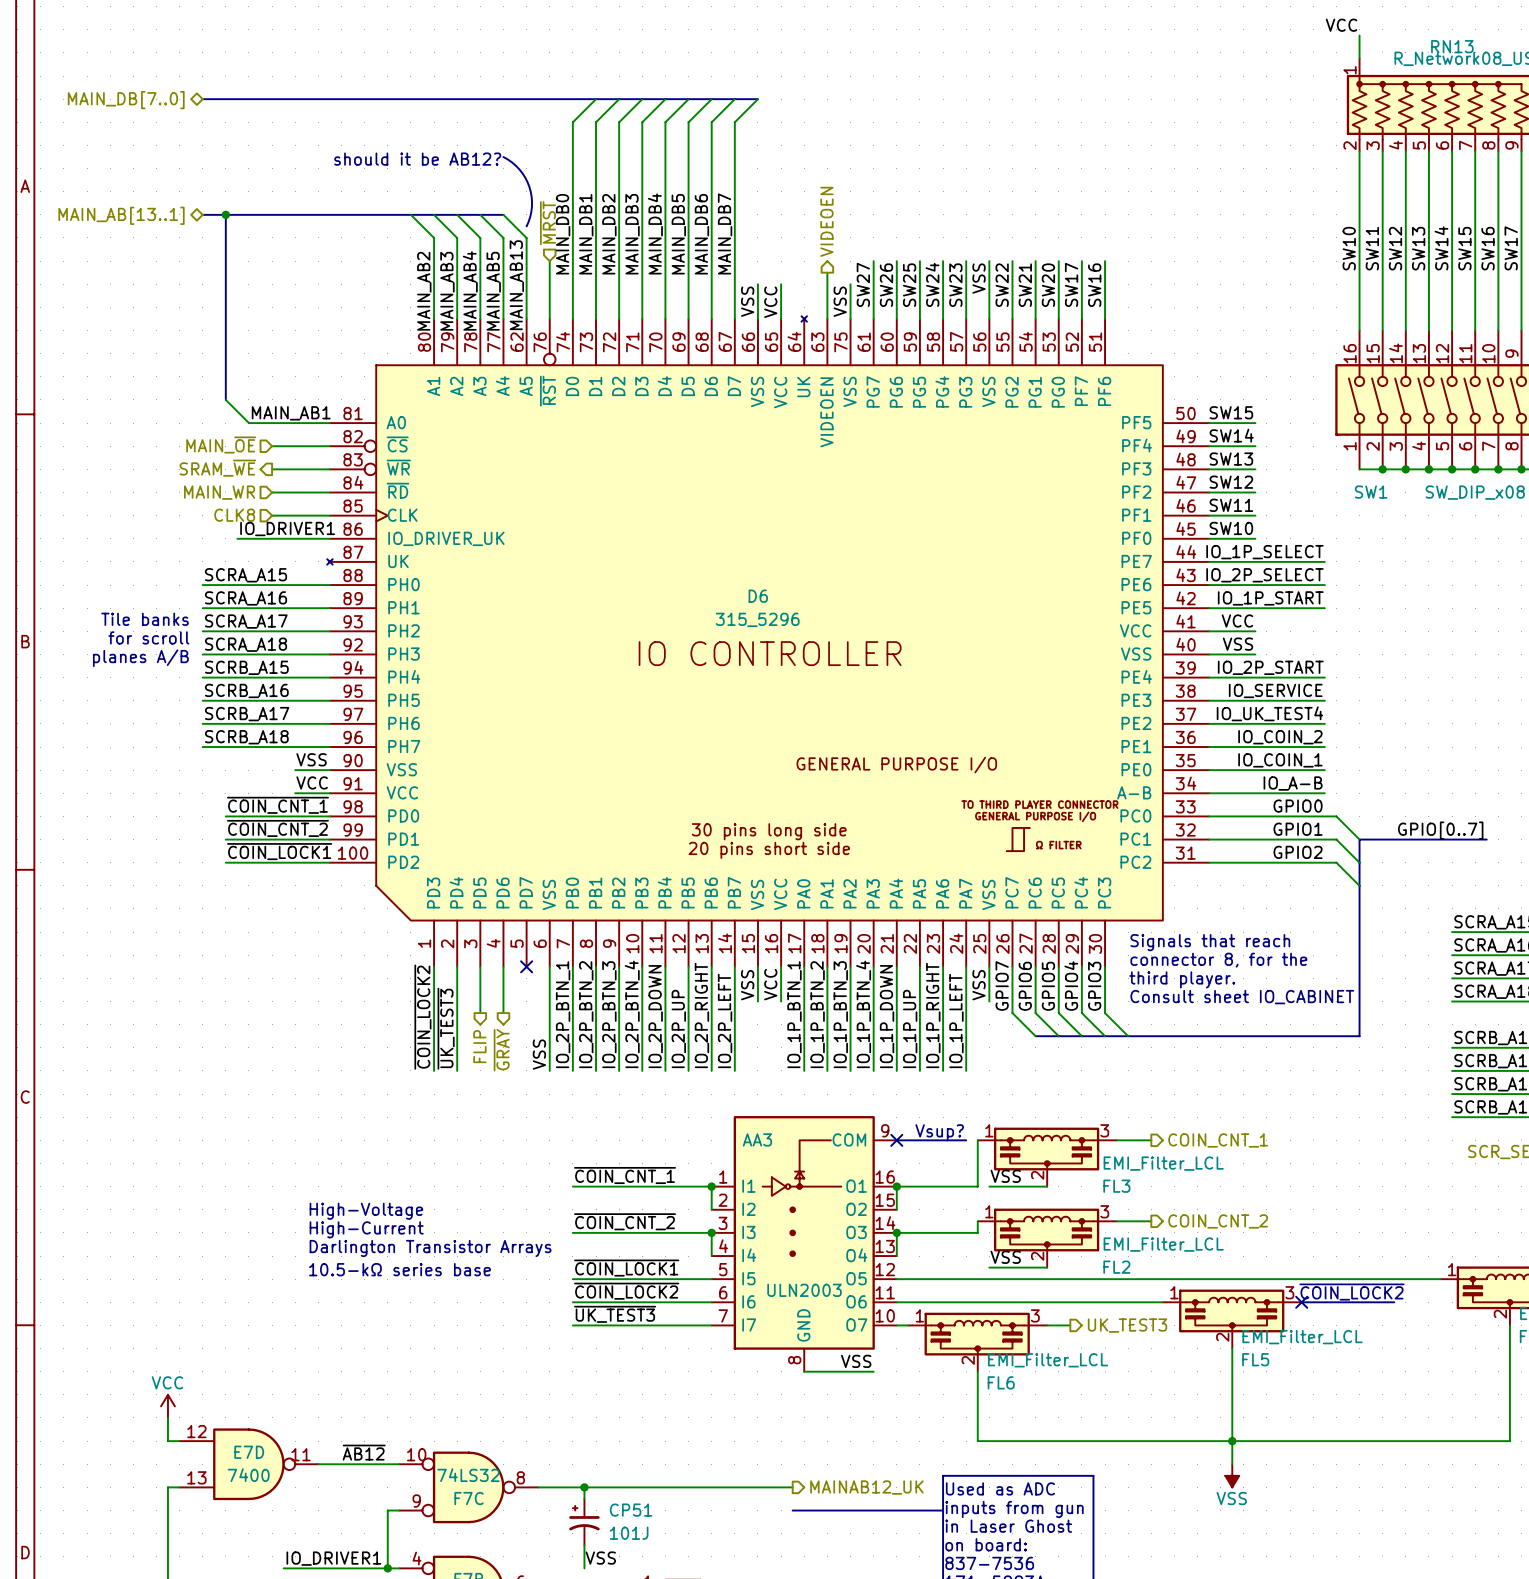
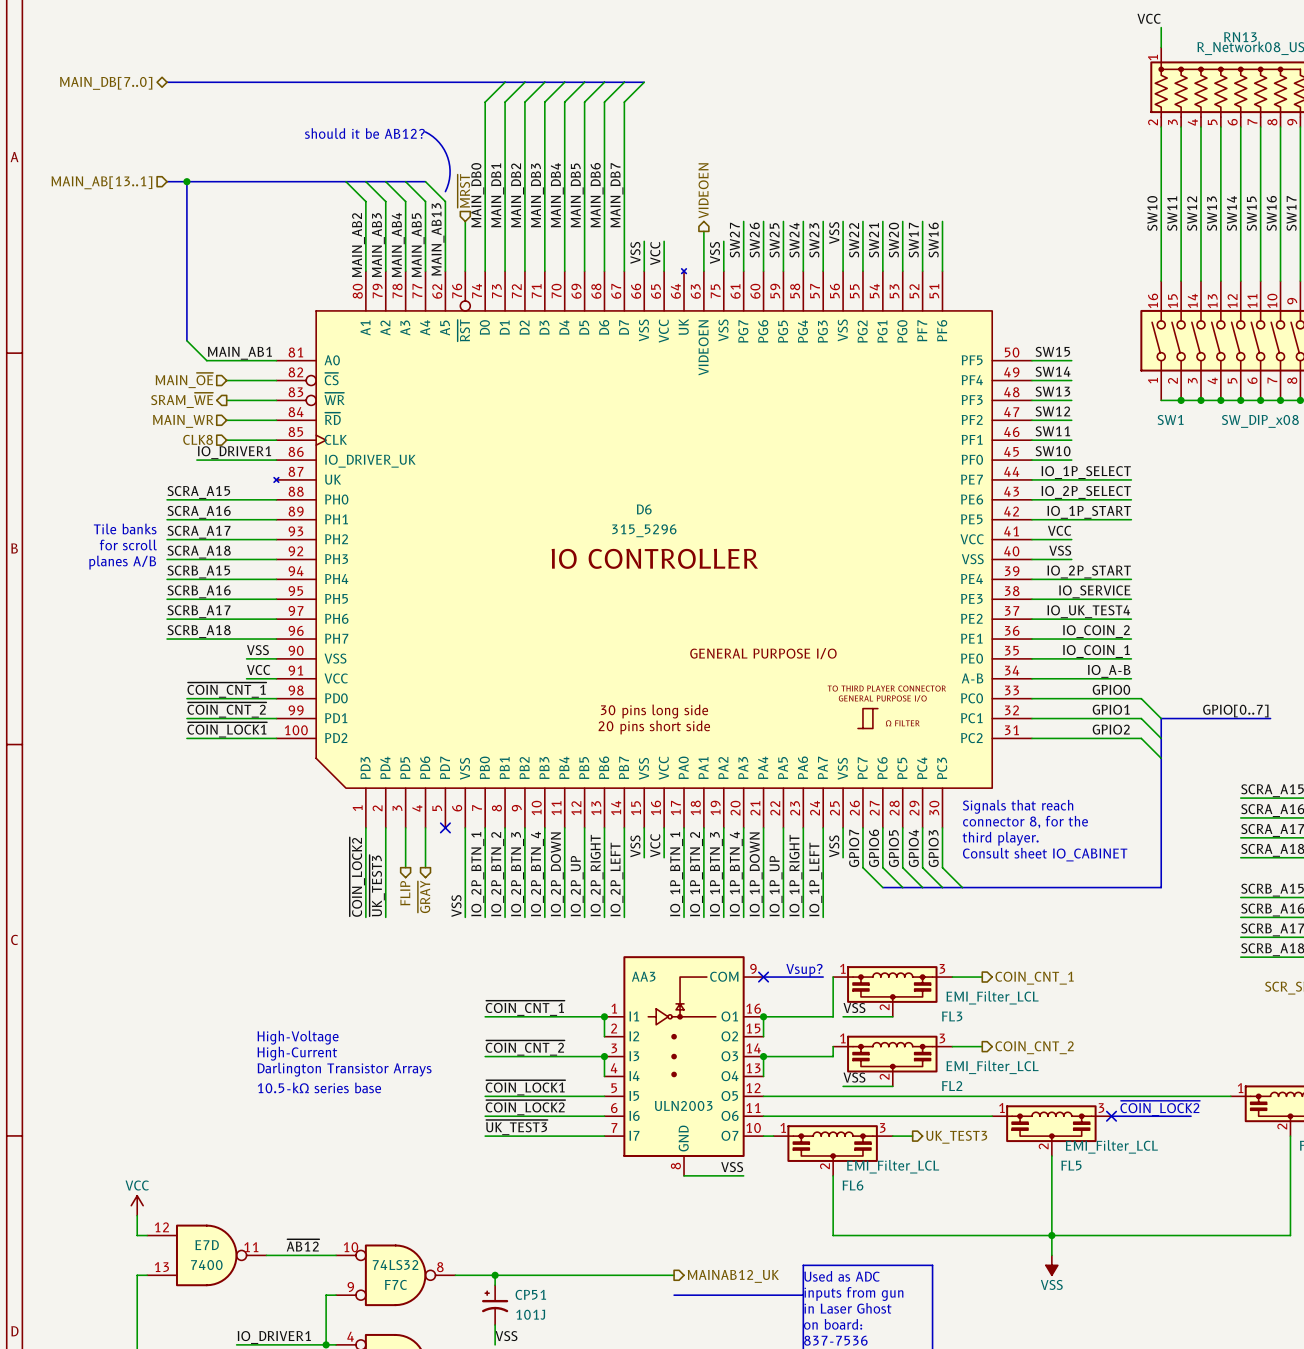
hierarchical label shape: bidirectional (121, 215) -> input (101, 182)

